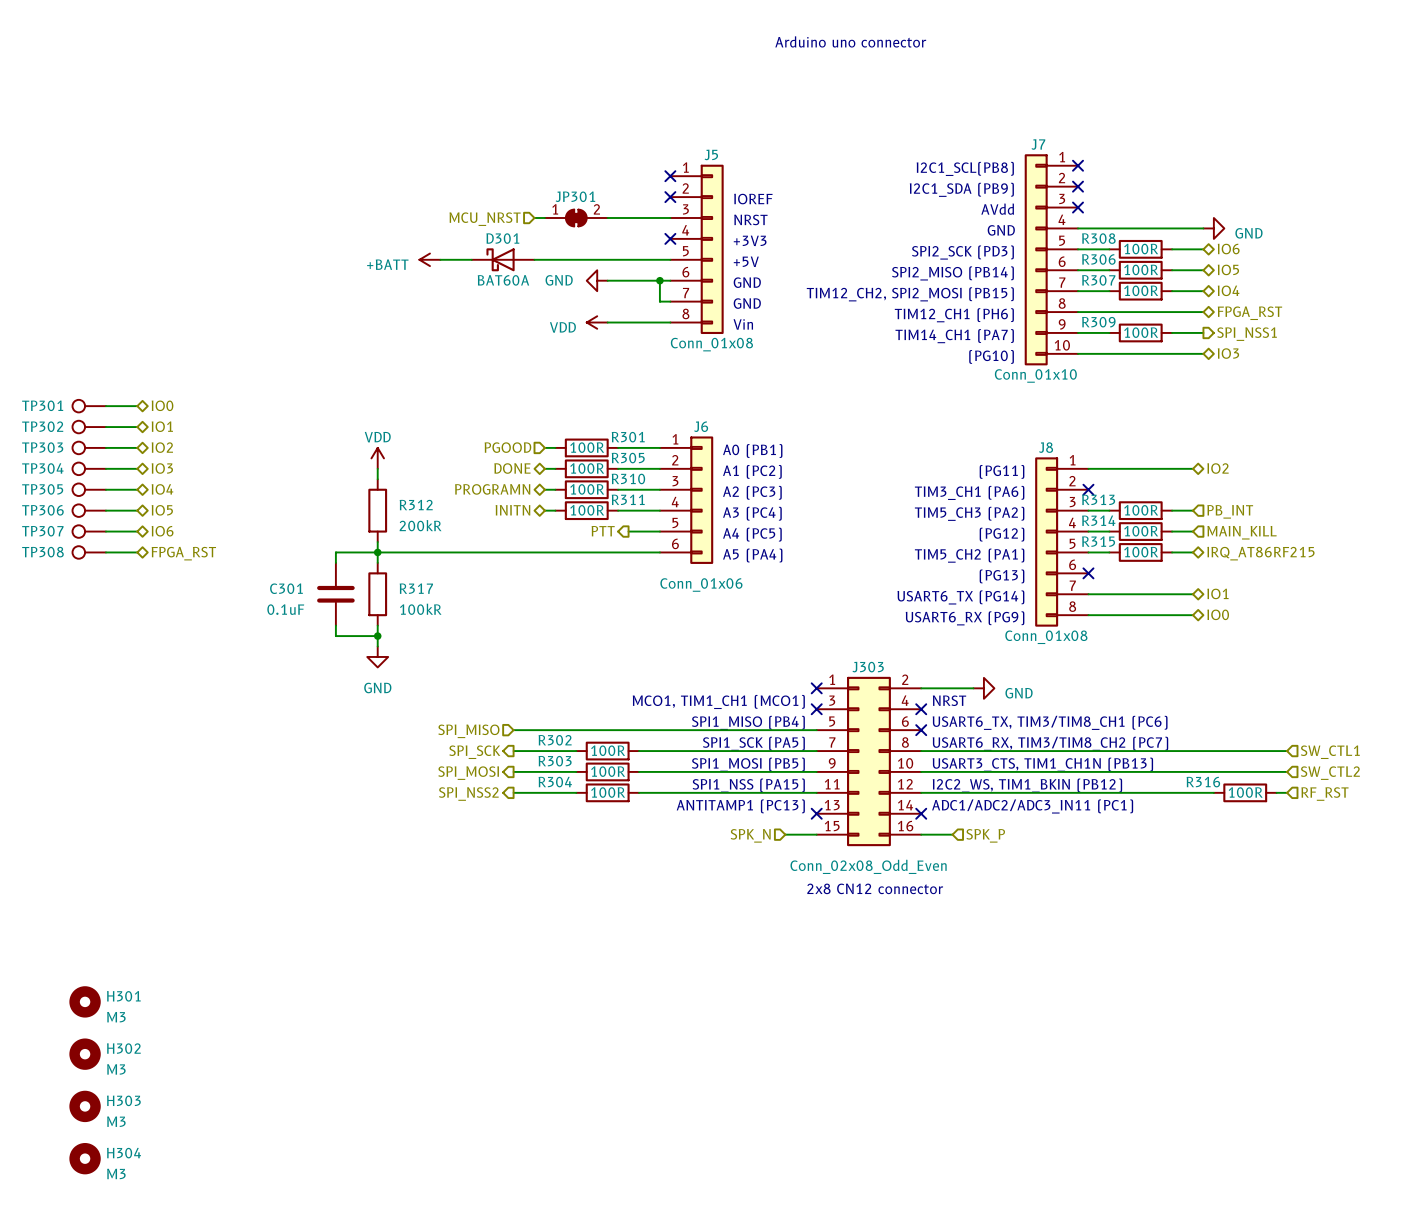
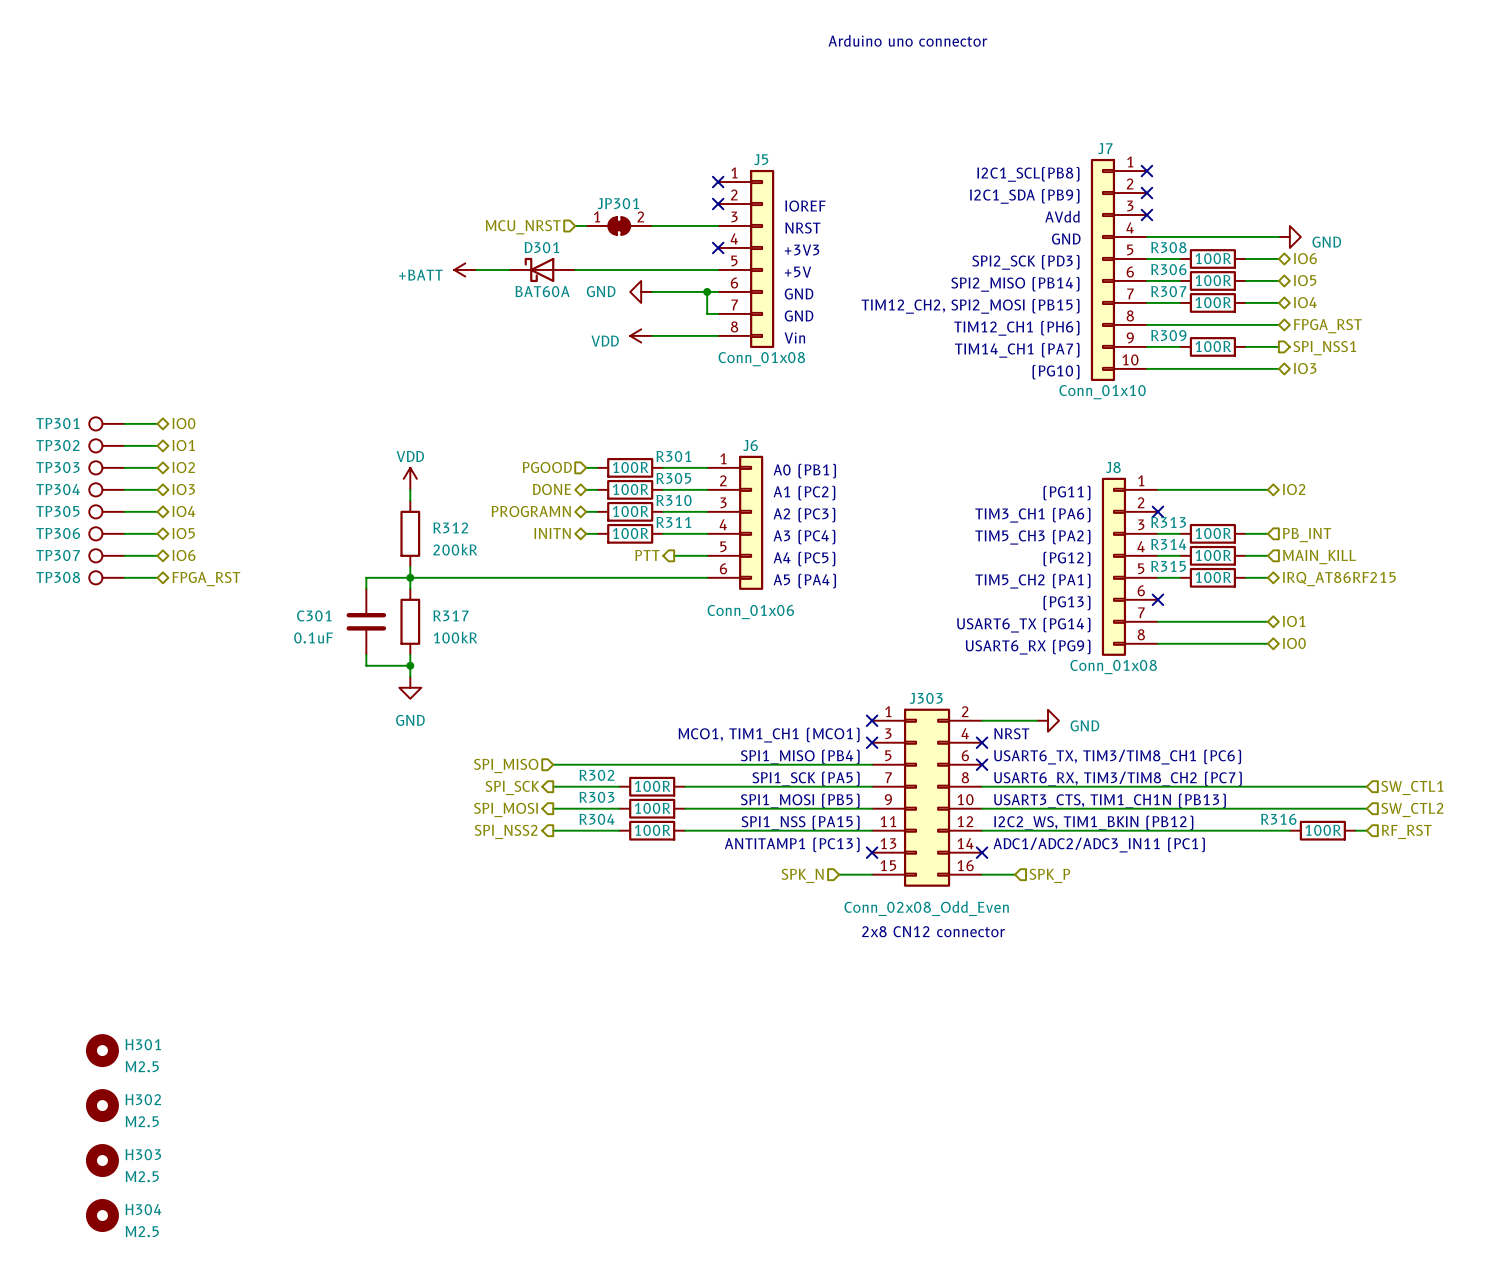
H301 value: M3 (116, 1017) -> M2.5 (142, 1066)
H302 value: M3 (116, 1069) -> M2.5 (142, 1121)
H303 value: M3 (116, 1121) -> M2.5 (142, 1176)
H304 value: M3 (116, 1173) -> M2.5 (142, 1231)

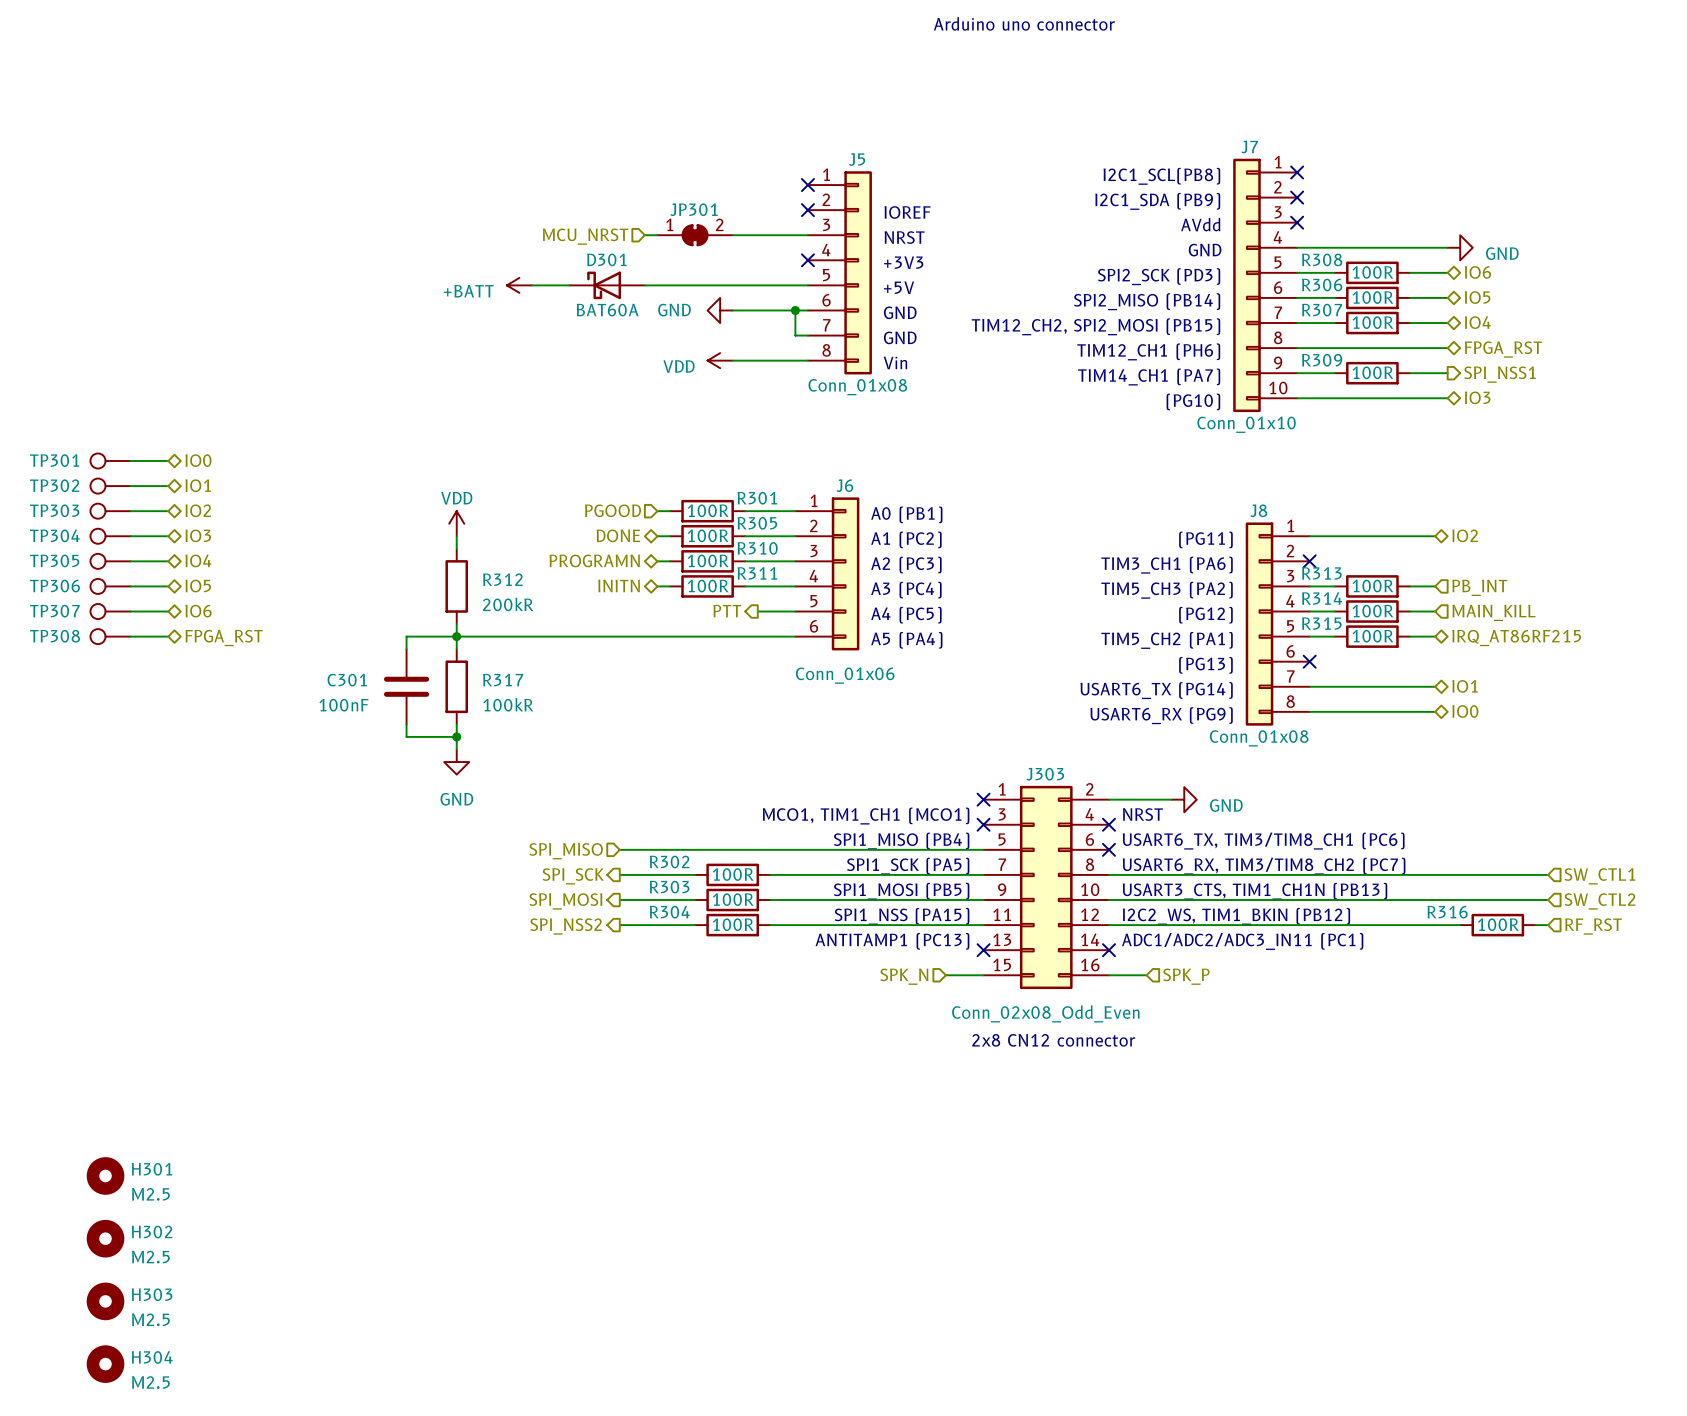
C301 value: 0.1uF (313, 637) -> 100nF (343, 705)

